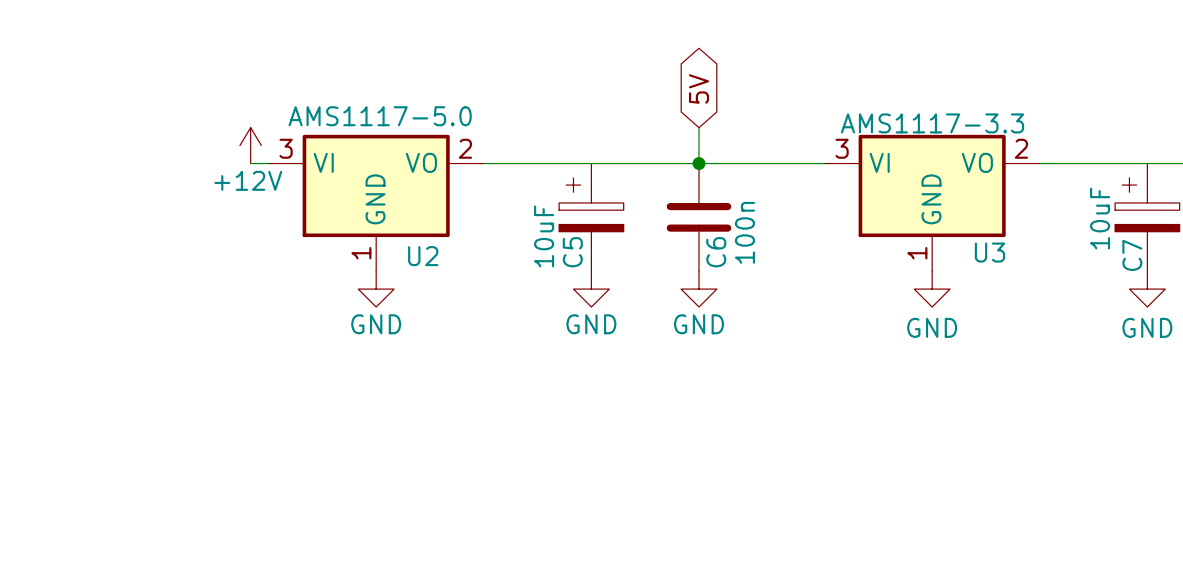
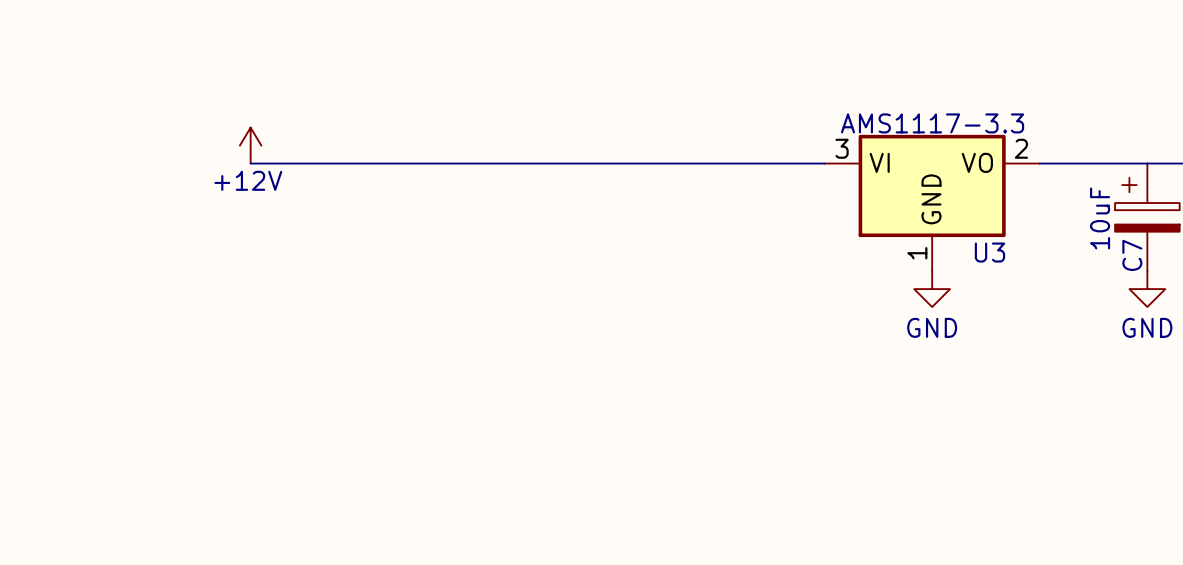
global label: 5V (699, 89) -> none
wire: (699, 127) (699, 163) -> none
junction: (699, 163) -> none
U2: AMS1117-5.0 (376, 203) -> none
C5: 10uF (591, 217) -> none
C6: 100n (699, 217) -> none
power symbol: GND (376, 289) -> none
power symbol: GND (591, 289) -> none
power symbol: GND (699, 289) -> none

